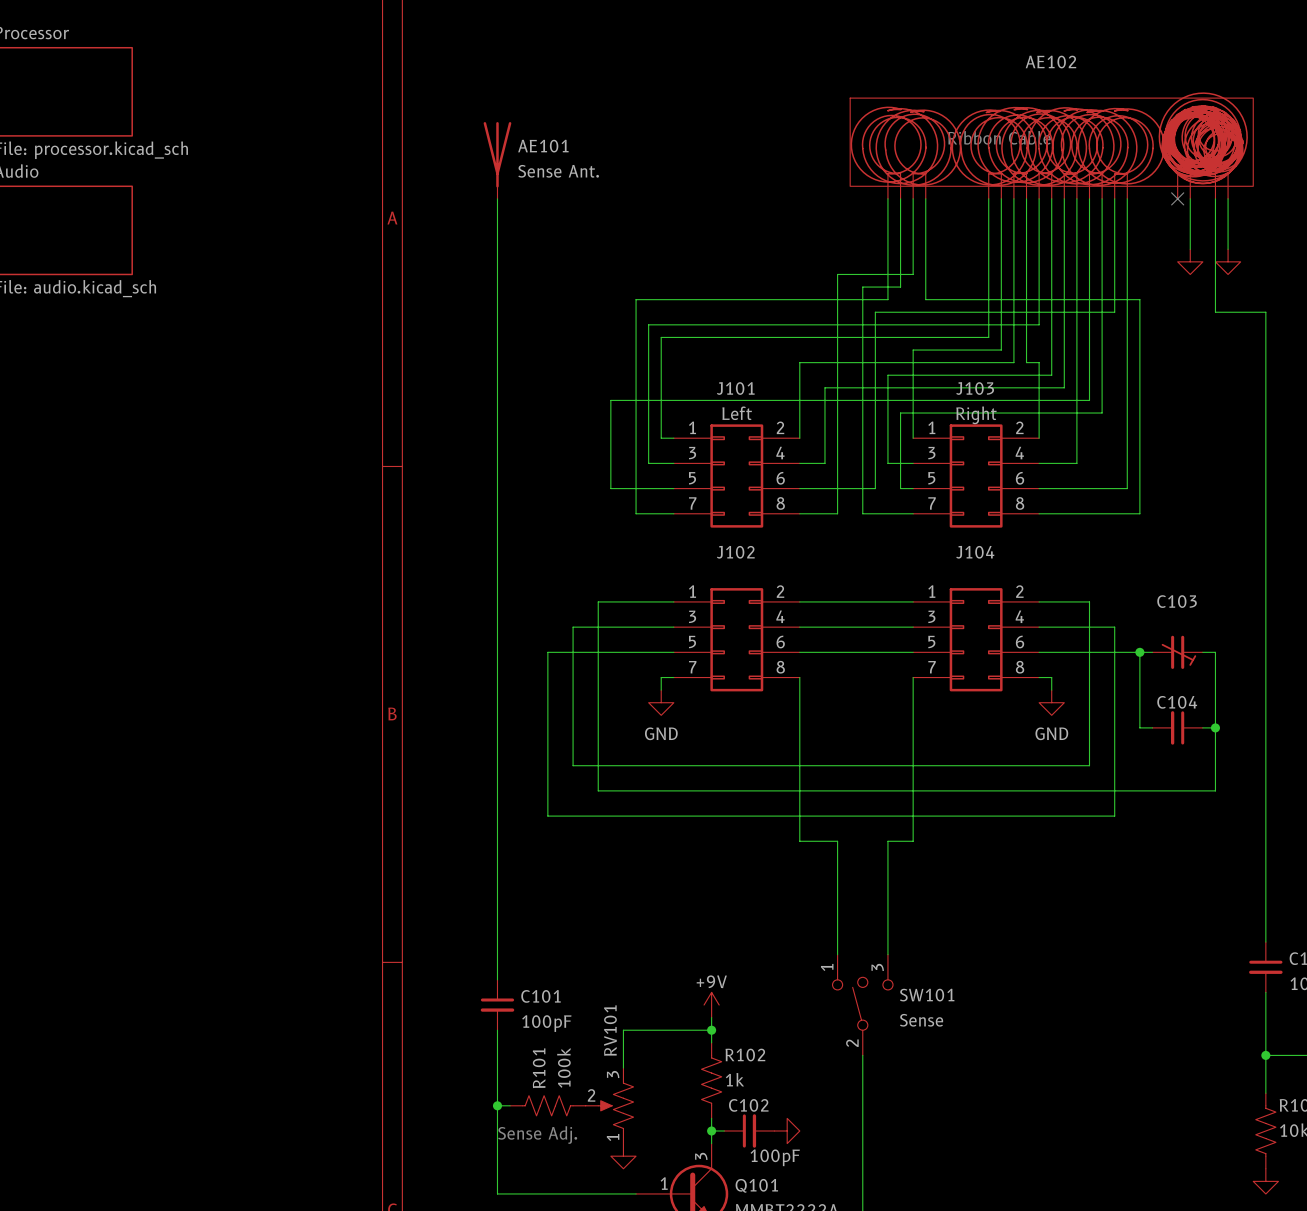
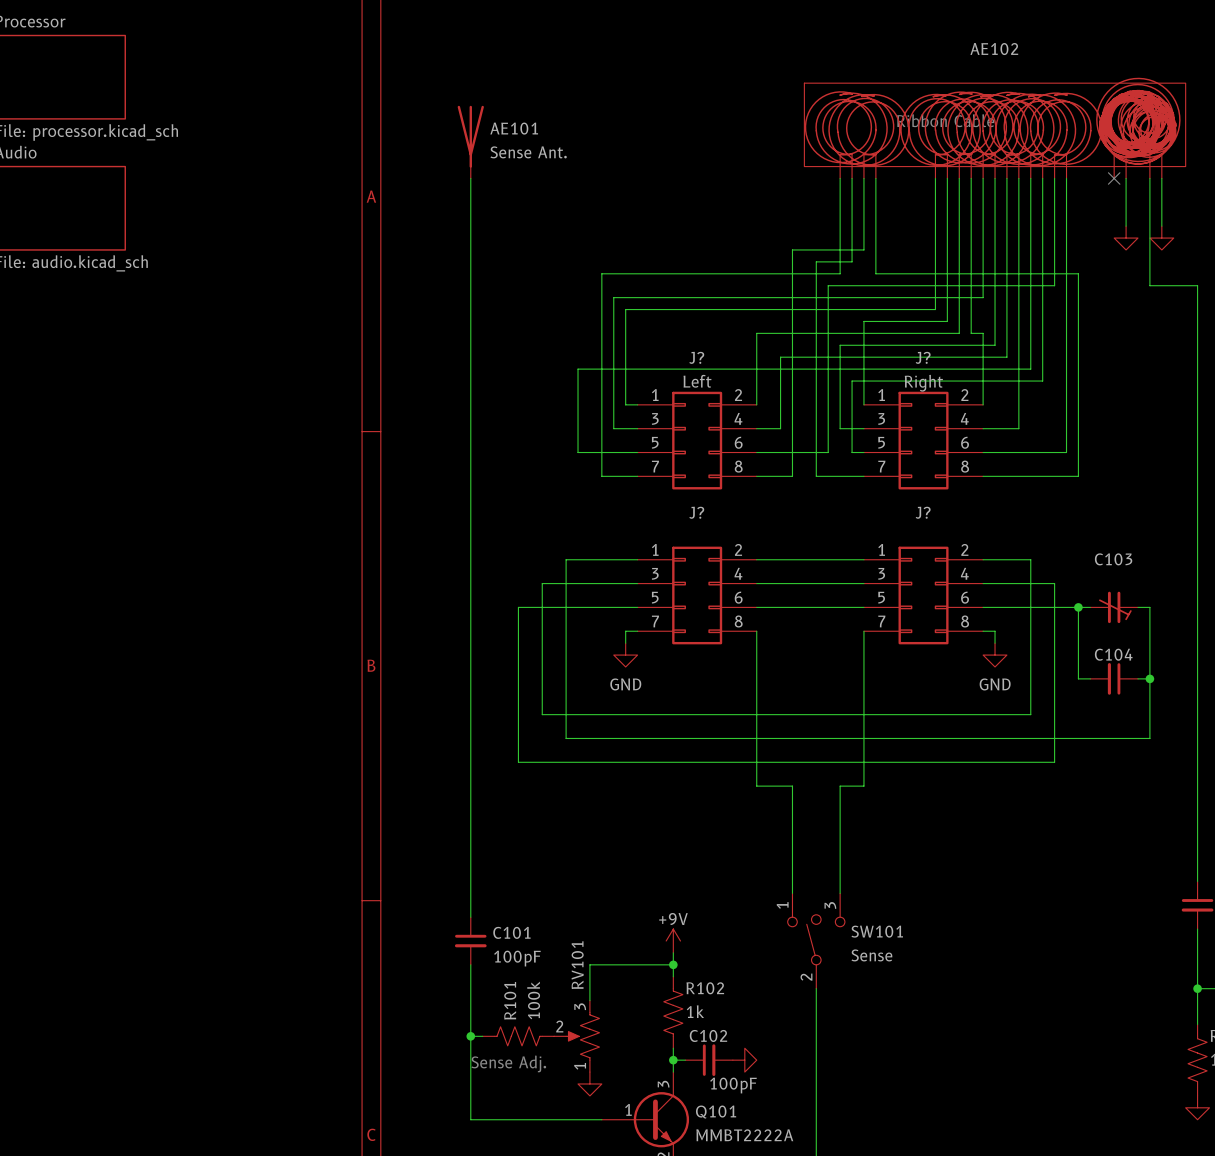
J101 name: J101 (735, 388) -> J? (696, 357)
J103 name: J103 (975, 388) -> J? (923, 357)
J102 name: J102 (735, 552) -> J? (696, 512)
J104 name: J104 (975, 552) -> J? (923, 512)

